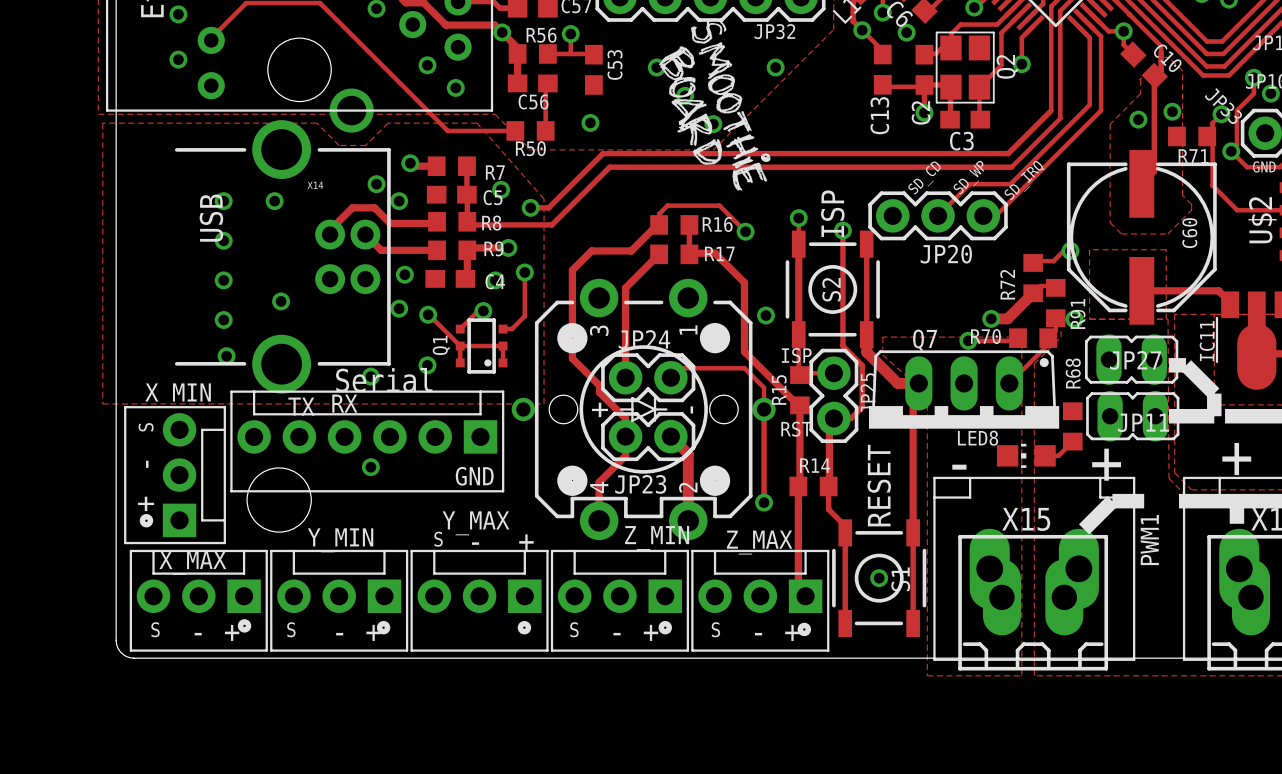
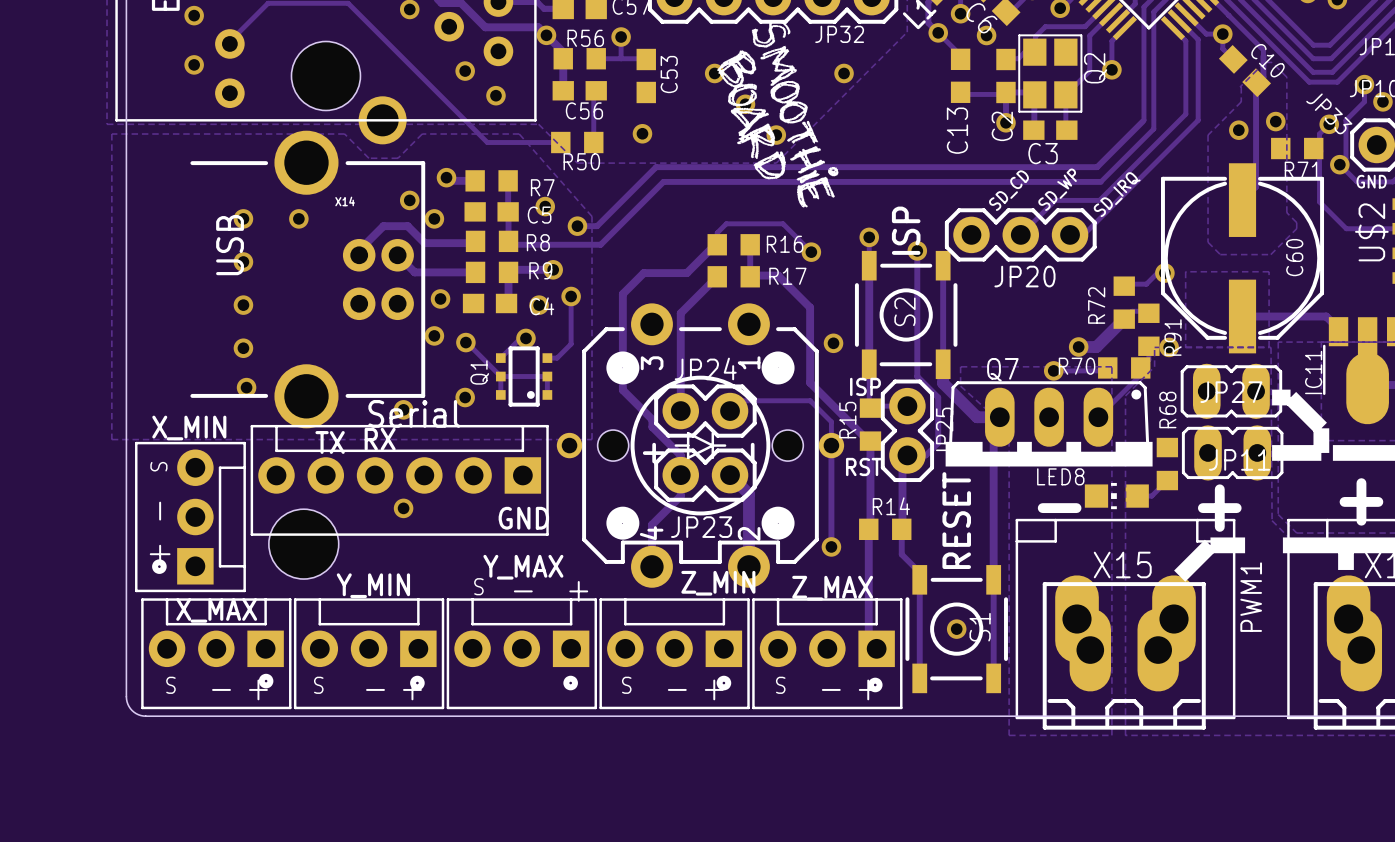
via: (281, 301) -> none

